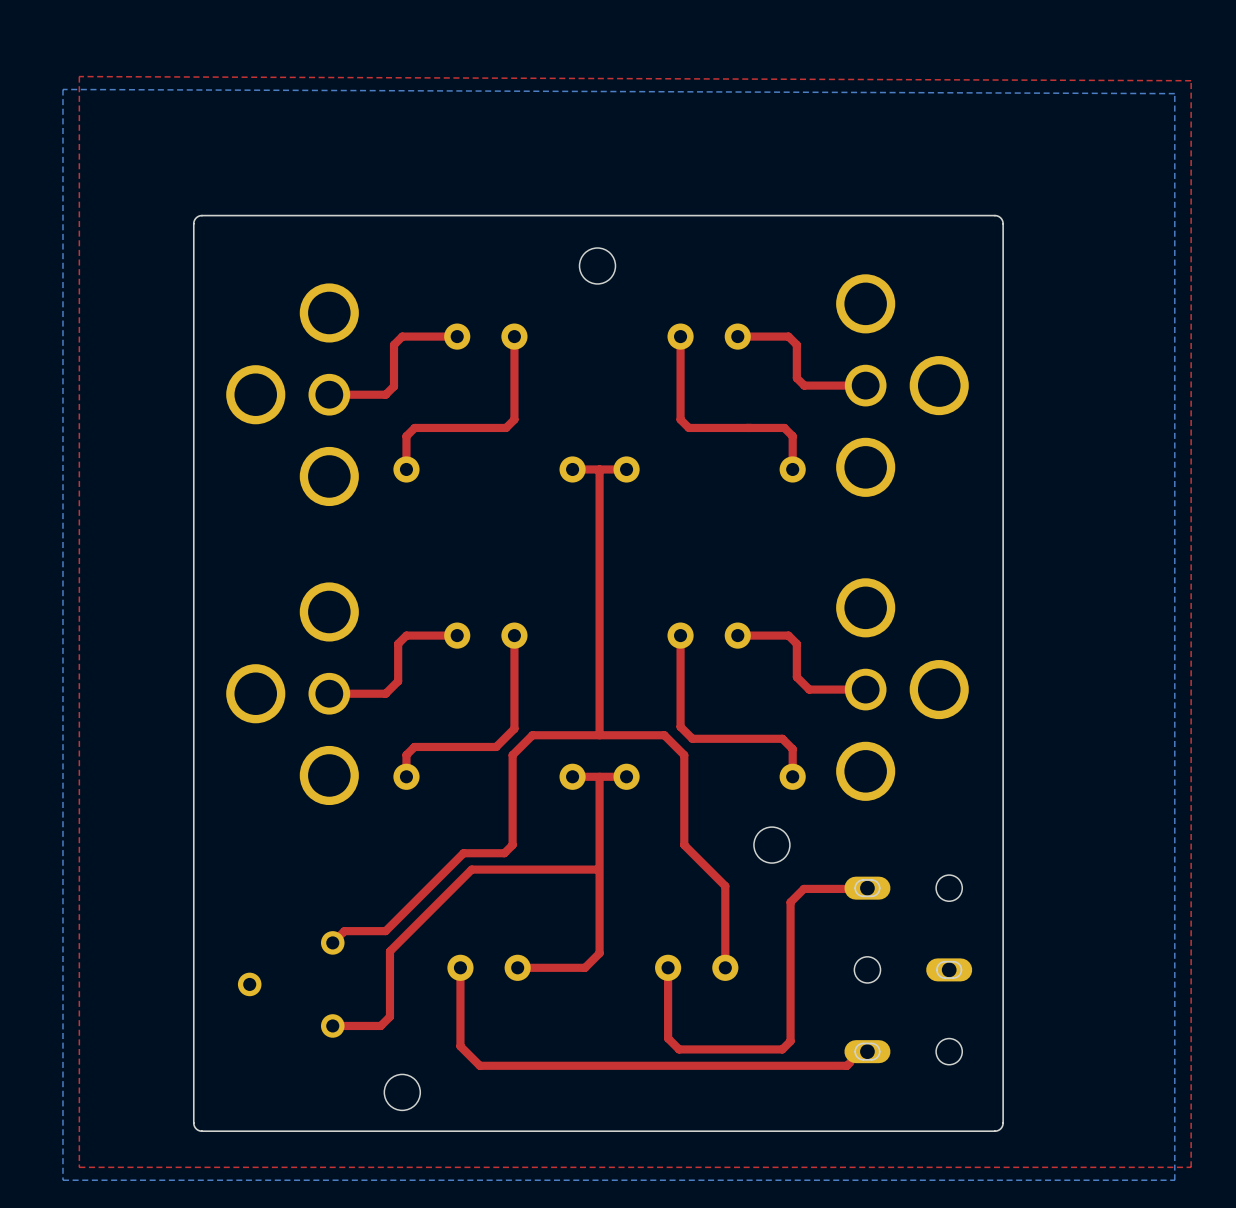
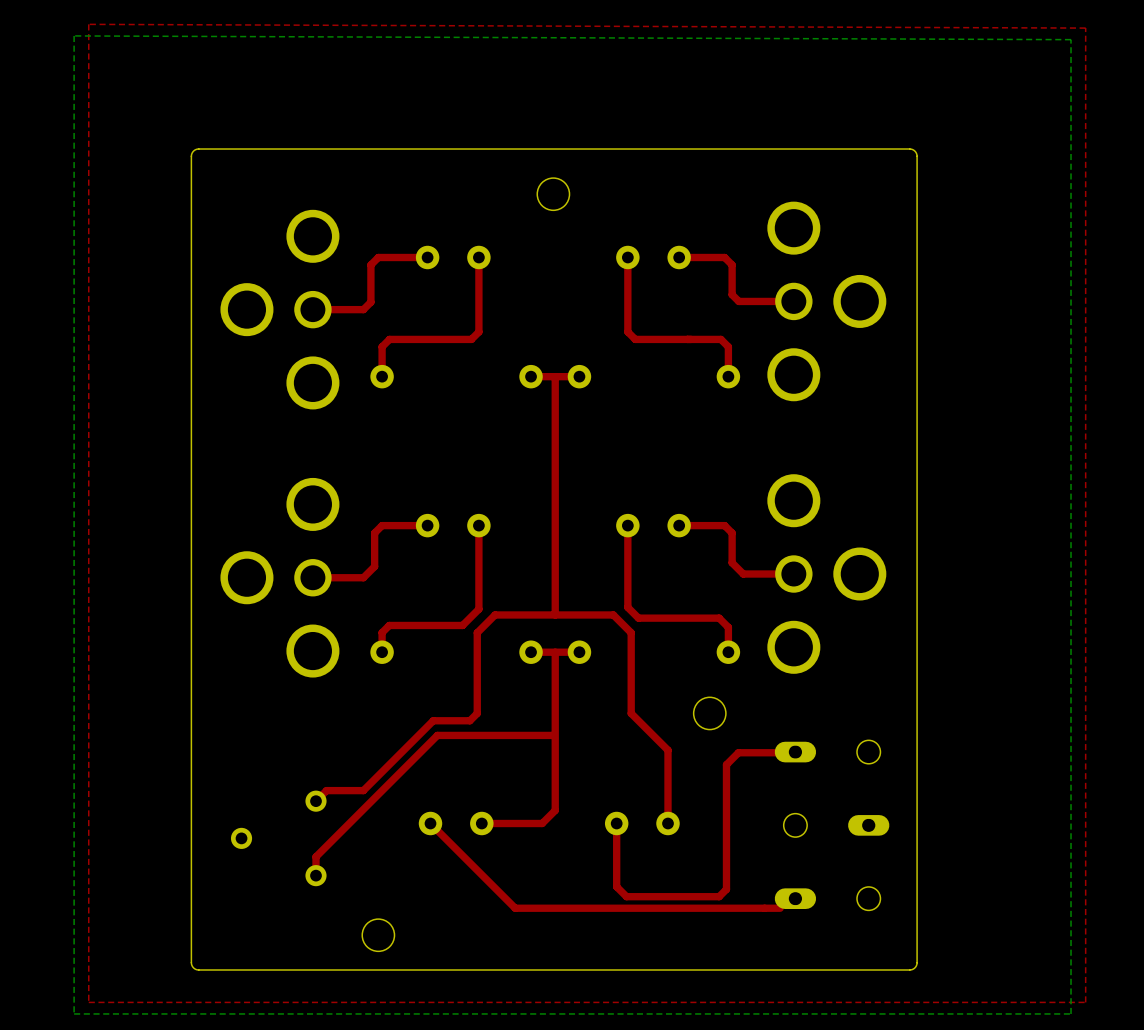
top track: (471, 869) (389, 951) (389, 1016) (380, 1025) (332, 1025) -> (440, 735) (437, 735) (316, 856) (316, 875)
top track: (460, 967) (460, 1046) (479, 1065) (846, 1065) (850, 1062) -> (430, 823) (515, 908) (780, 908)

